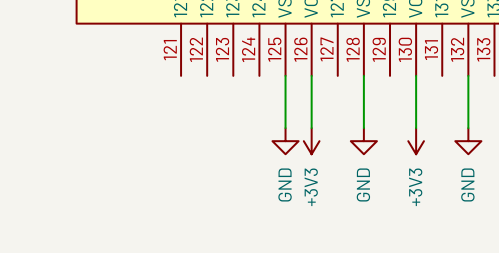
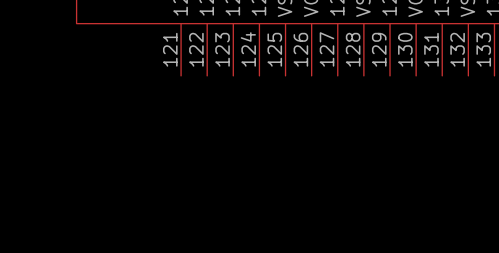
wire: (285, 75) (285, 128) -> none
wire: (311, 75) (311, 128) -> none
wire: (363, 75) (363, 128) -> none
wire: (416, 75) (416, 128) -> none
wire: (468, 75) (468, 128) -> none
power symbol: GND (285, 141) -> none
power symbol: +3V3 (311, 141) -> none
power symbol: GND (363, 141) -> none
power symbol: +3V3 (416, 141) -> none
power symbol: GND (468, 141) -> none

